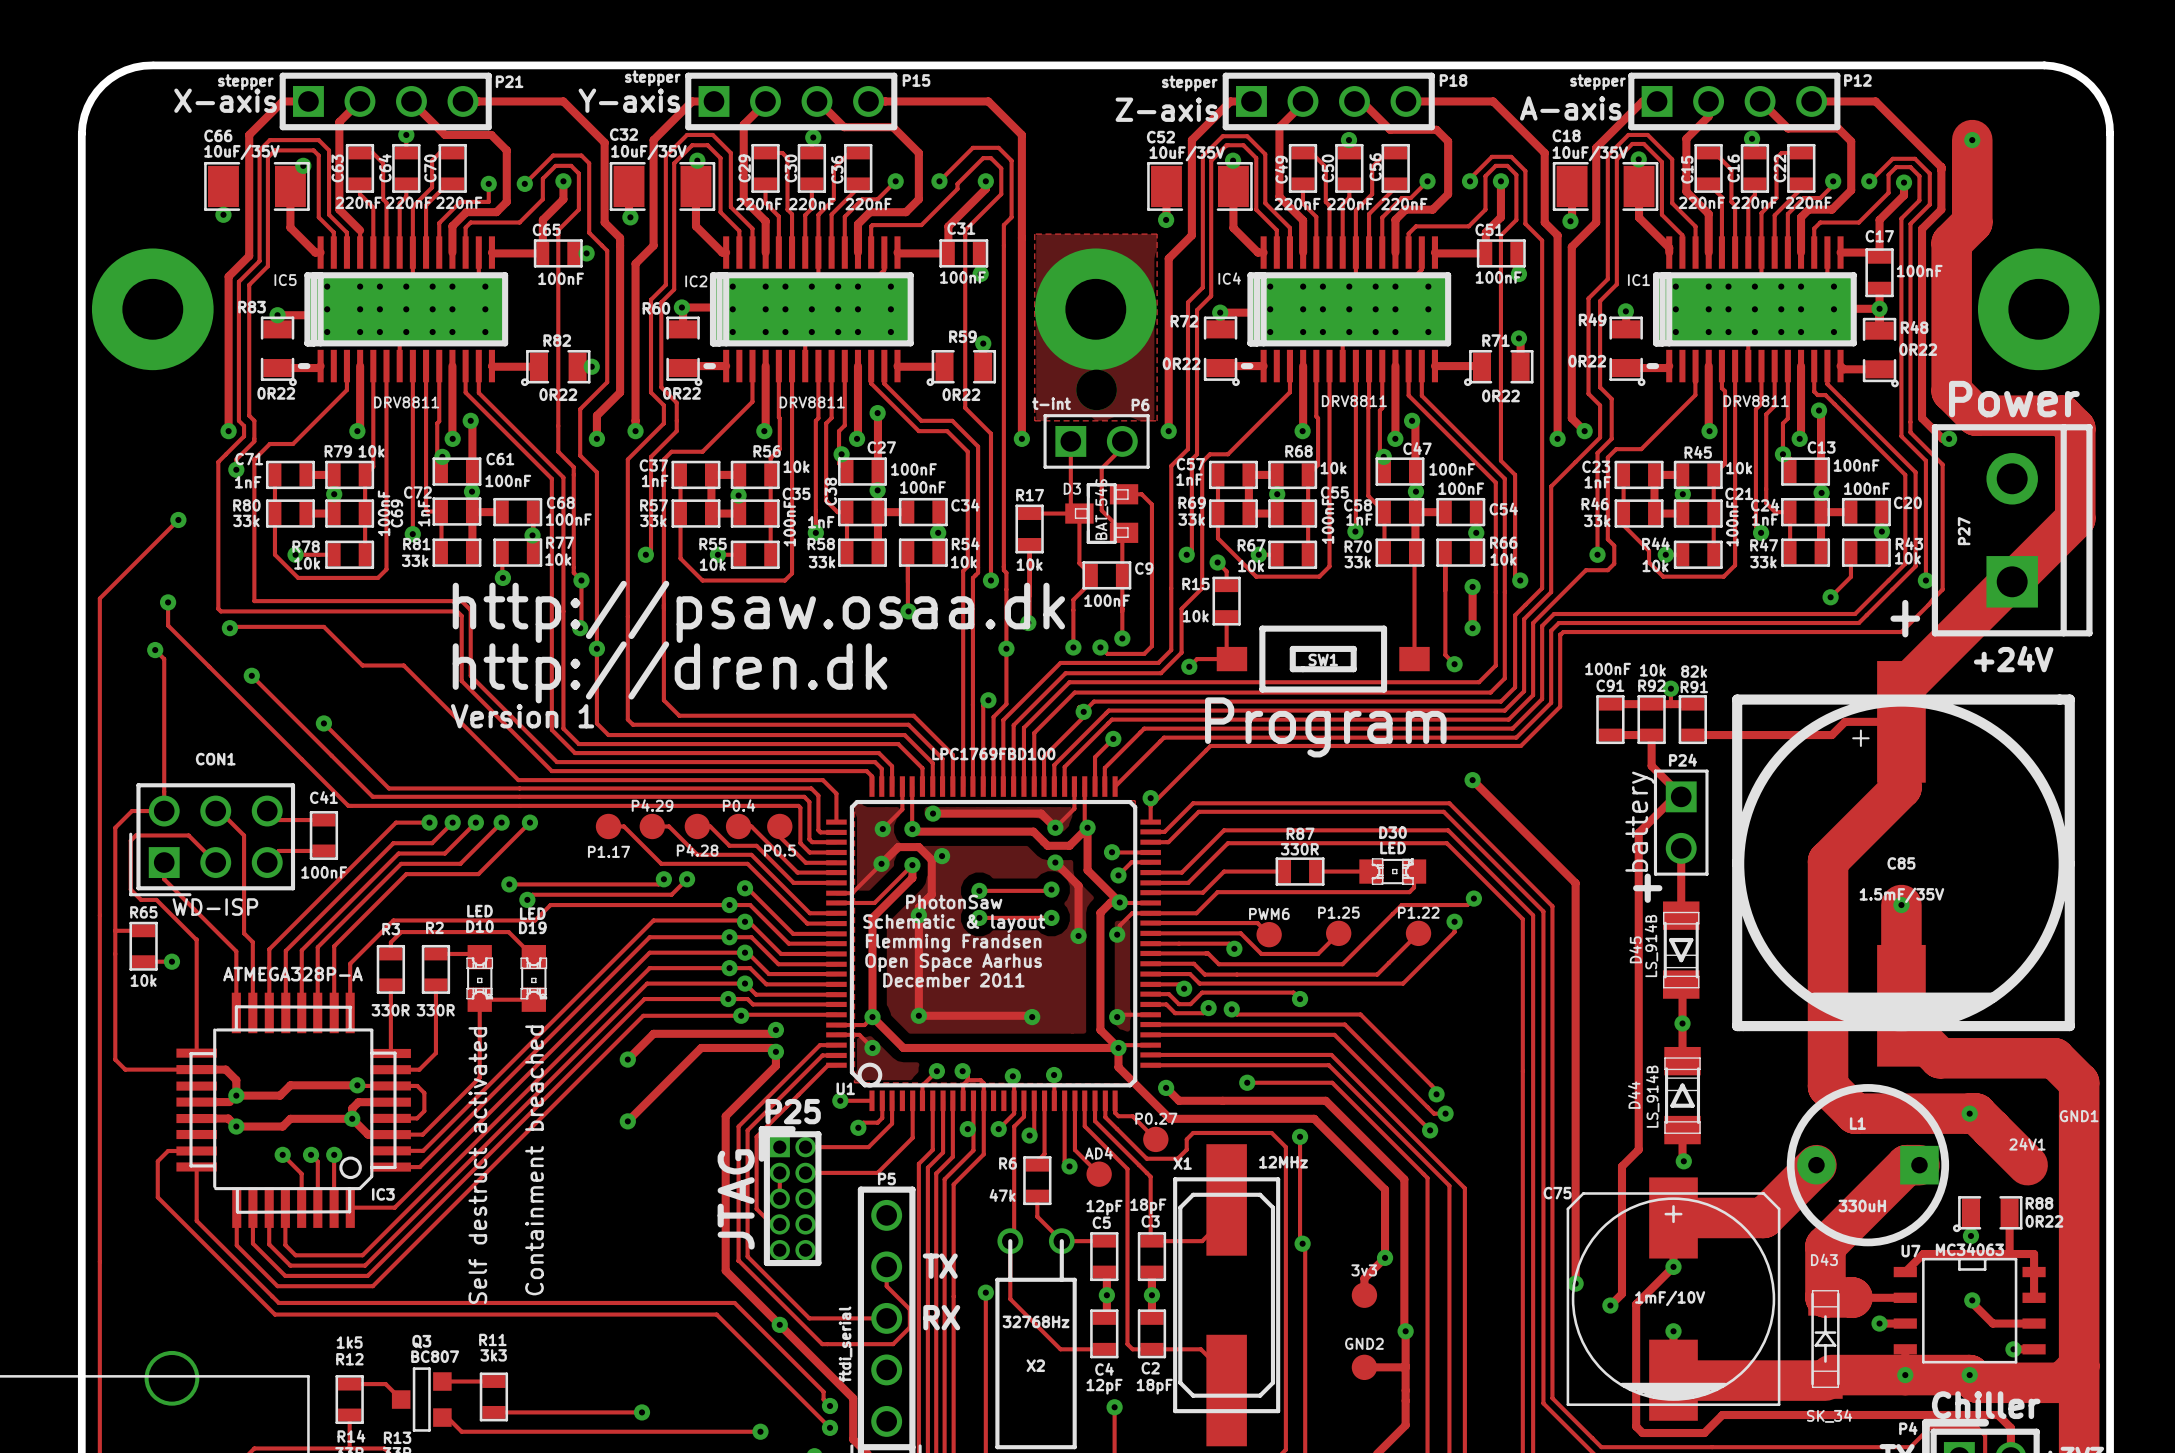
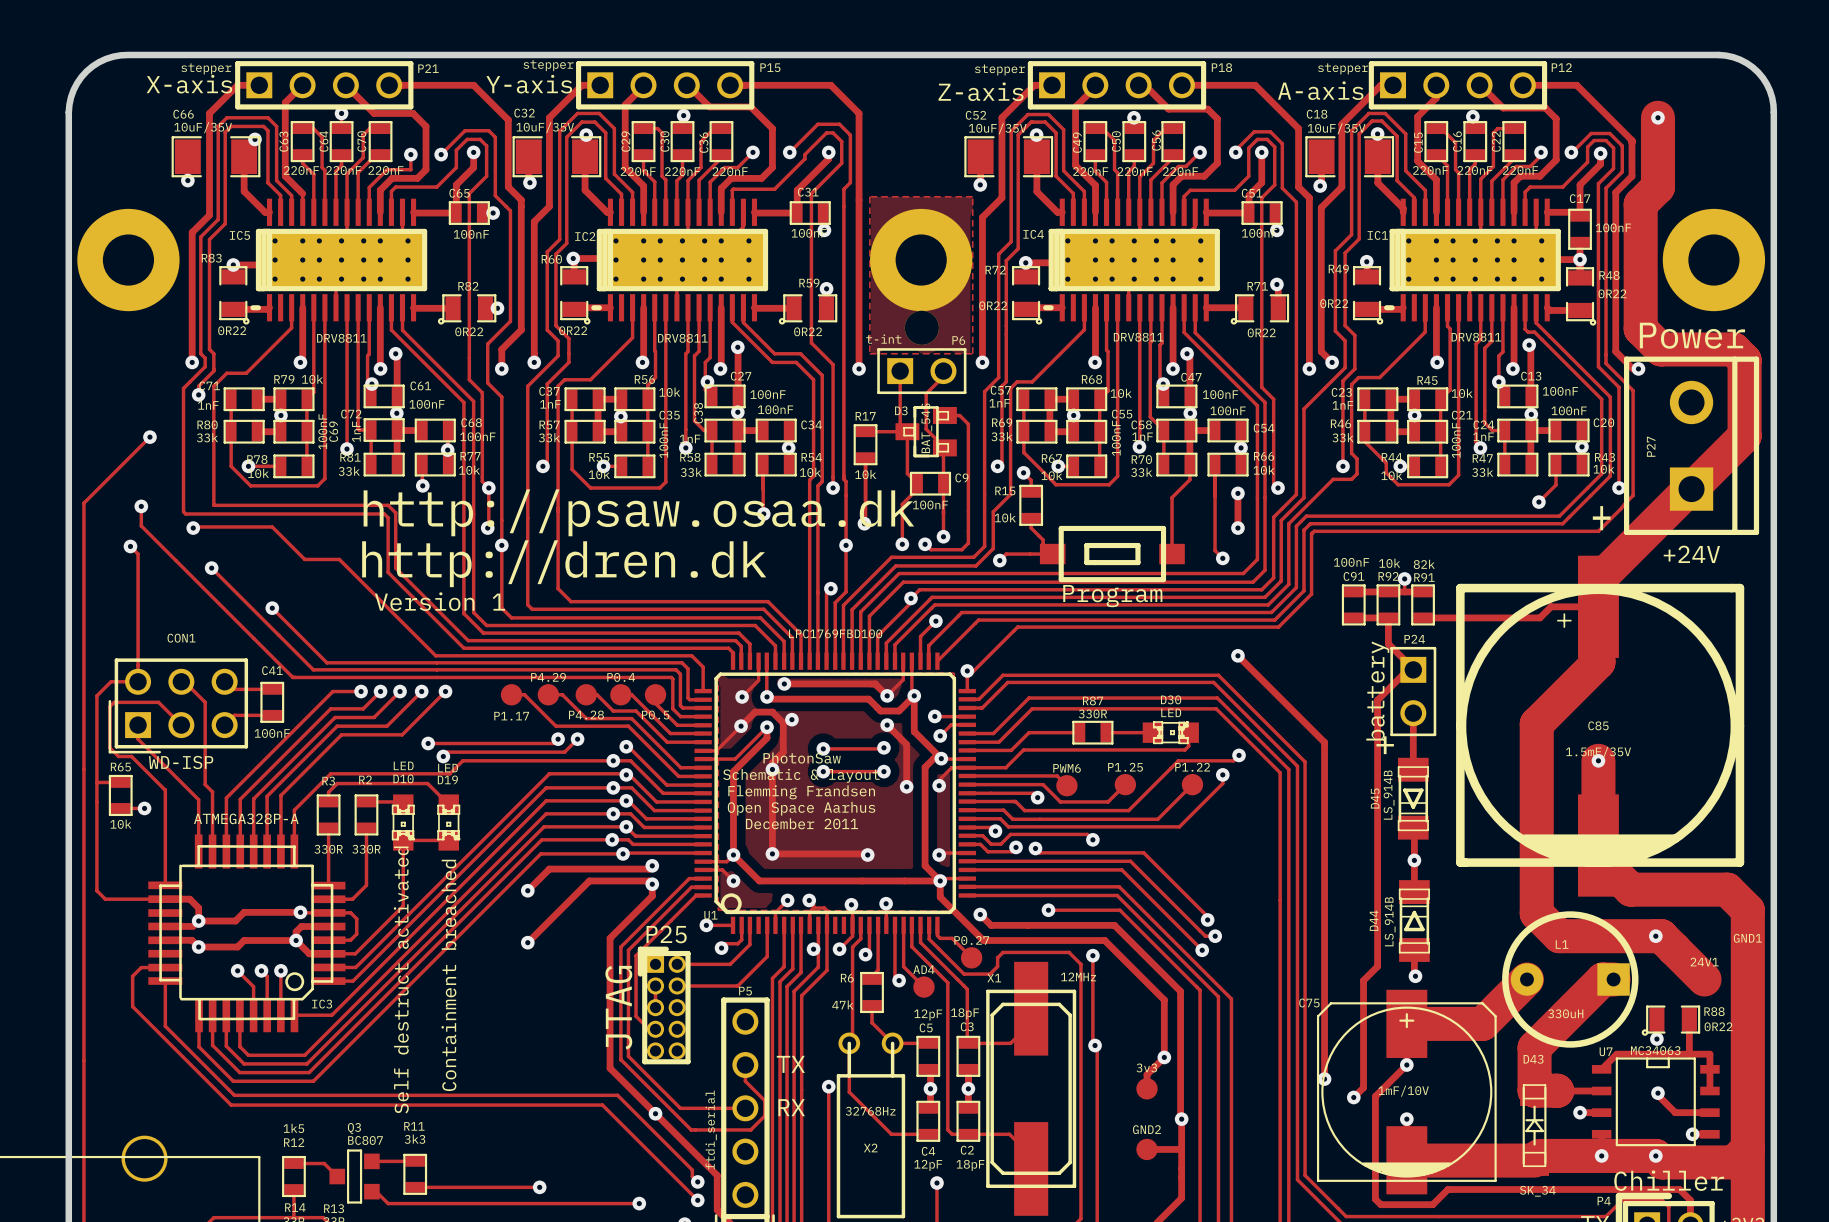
track: none -> (1189, 464) (1189, 479) (1172, 497) (1172, 554)
track: (1414, 553) (1414, 659) -> none
track: (1226, 628) (1226, 653) (1231, 659) -> (1031, 528) (1043, 539) (1043, 544) (1052, 554) (1035, 554)
SW1: Program (1323, 659) -> none
part: none -> Program (1112, 554)

